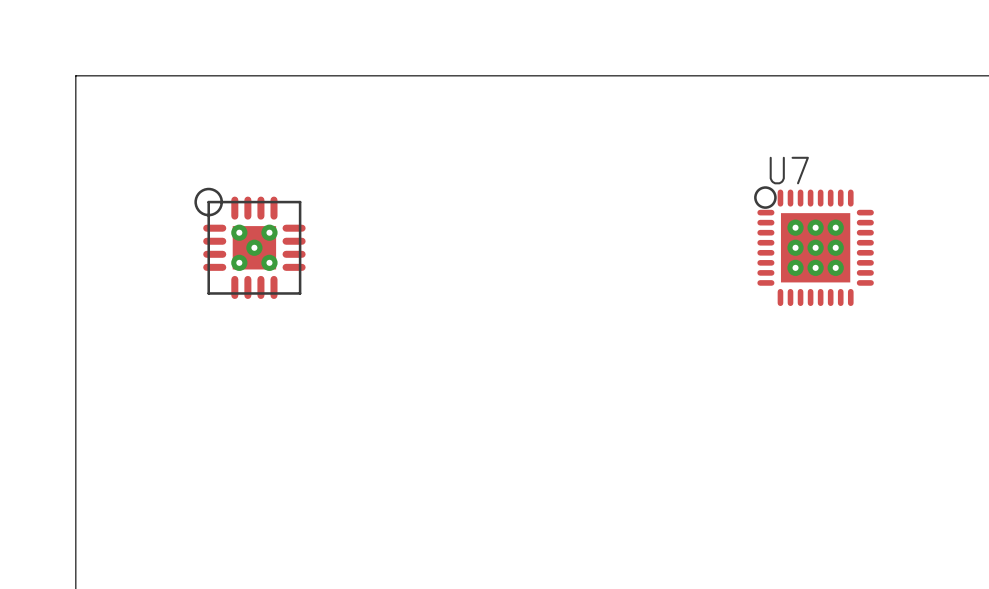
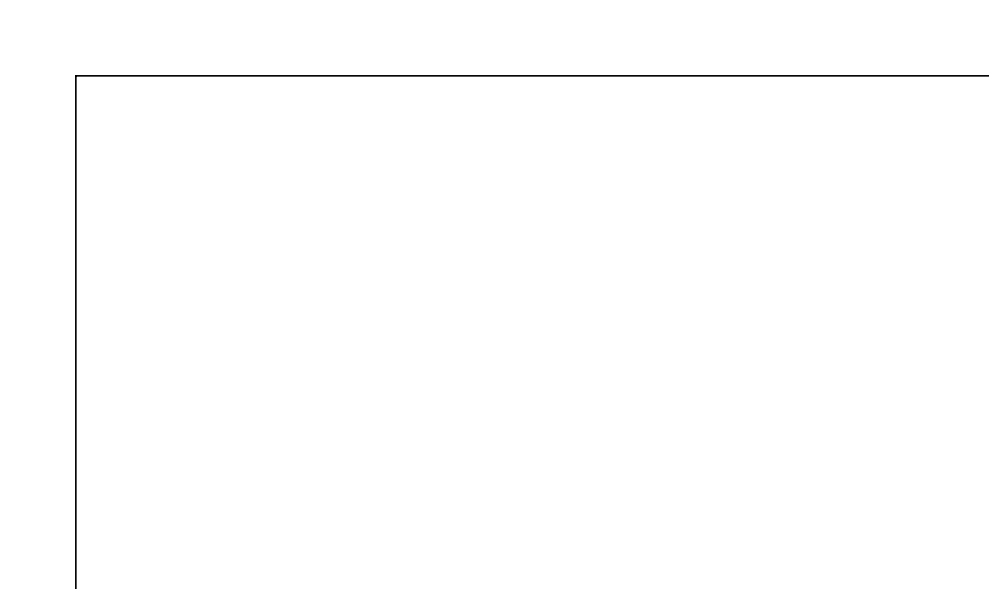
part: (250, 243) -> none
U7: (813, 246) -> none

